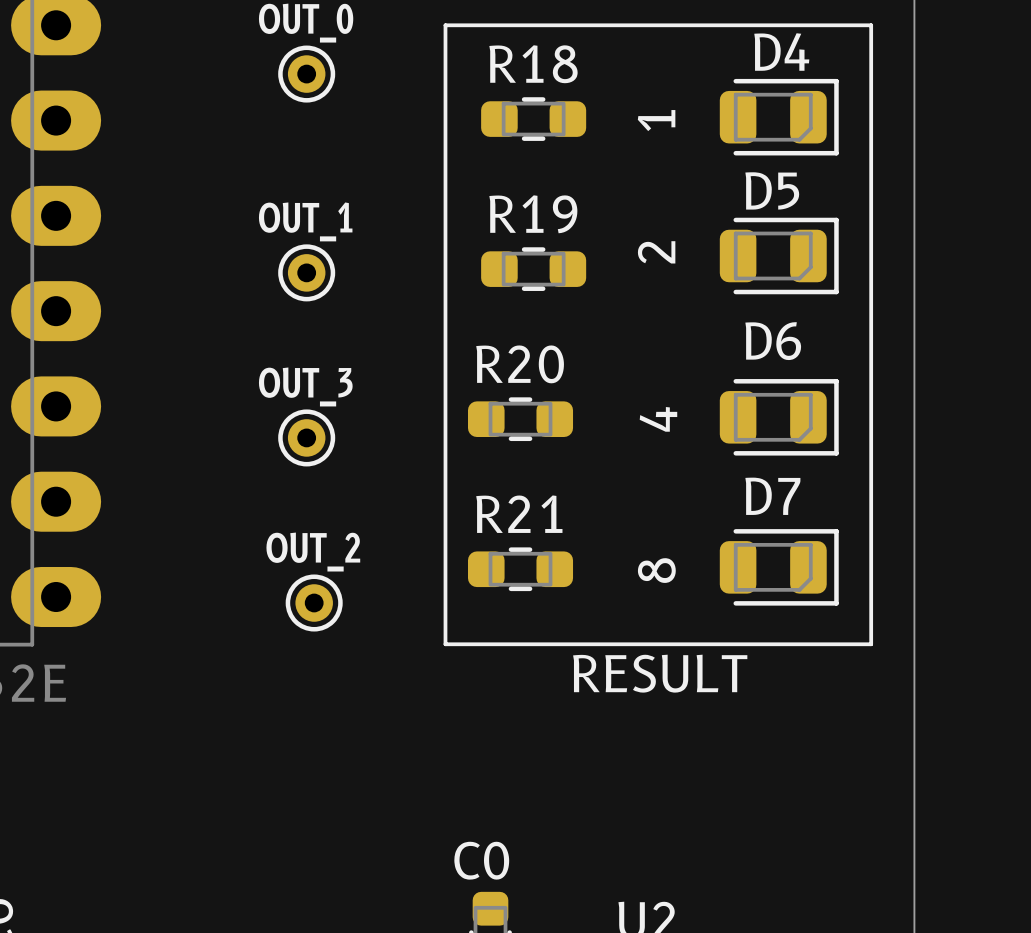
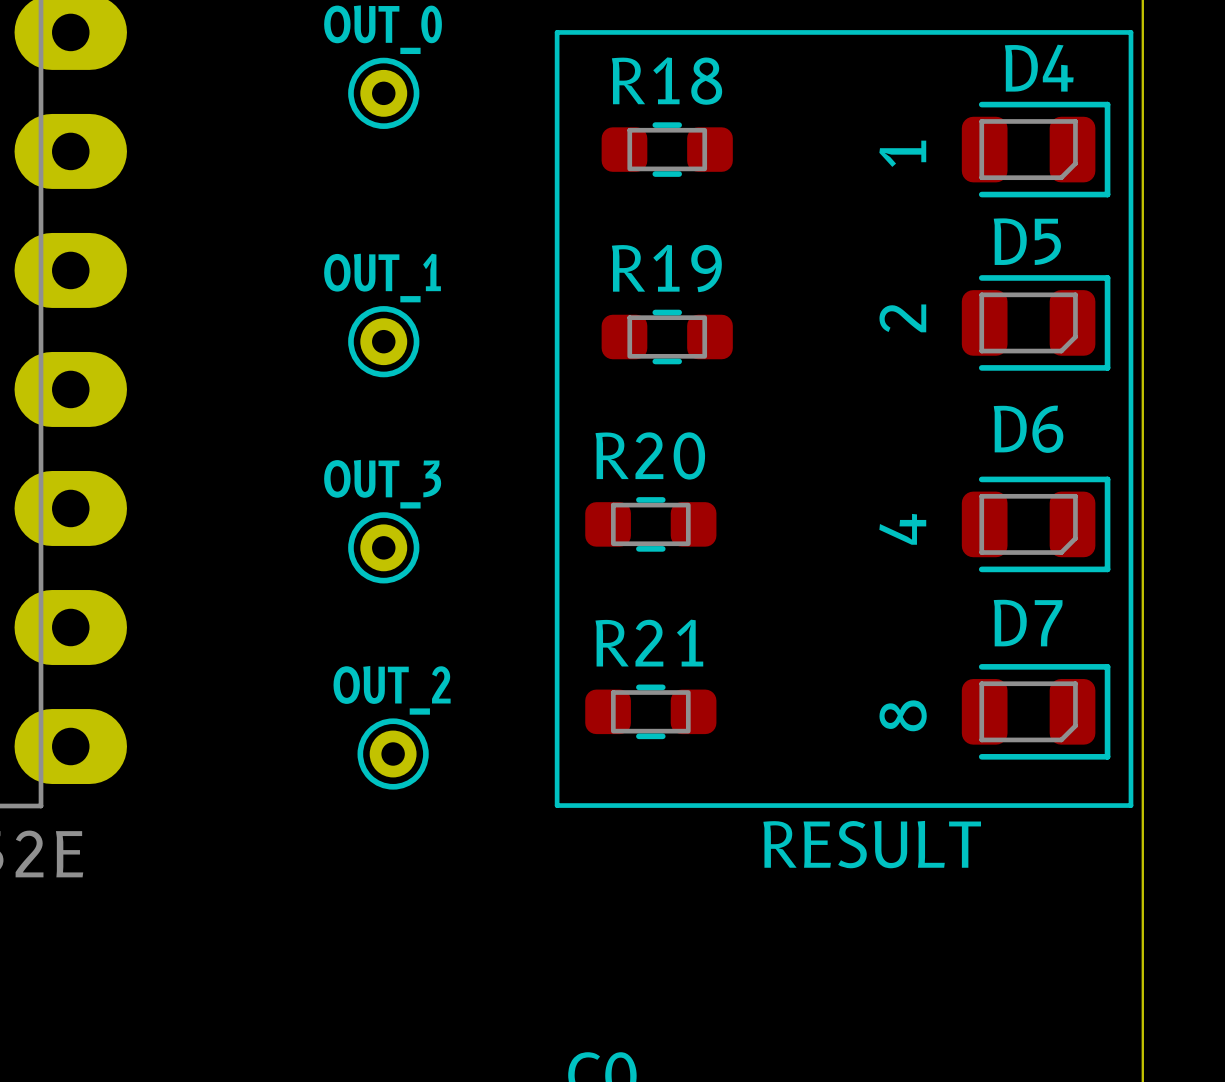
line: (871, 25) (871, 644) -> (1088, 32) (1130, 32) (1130, 805) (1088, 805)
D4 position: (779, 117) -> (1036, 149)
text position: 1 (656, 120) -> 1 (902, 153)
text position: 2 (656, 252) -> 2 (902, 318)
D5 position: (779, 256) -> (1036, 322)
D6 position: (779, 417) -> (1036, 524)
text position: 4 (658, 419) -> 4 (902, 529)
D7 position: (779, 567) -> (1036, 711)
text position: 8 (656, 570) -> 8 (903, 715)
text position: RESULT (660, 673) -> RESULT (872, 844)

